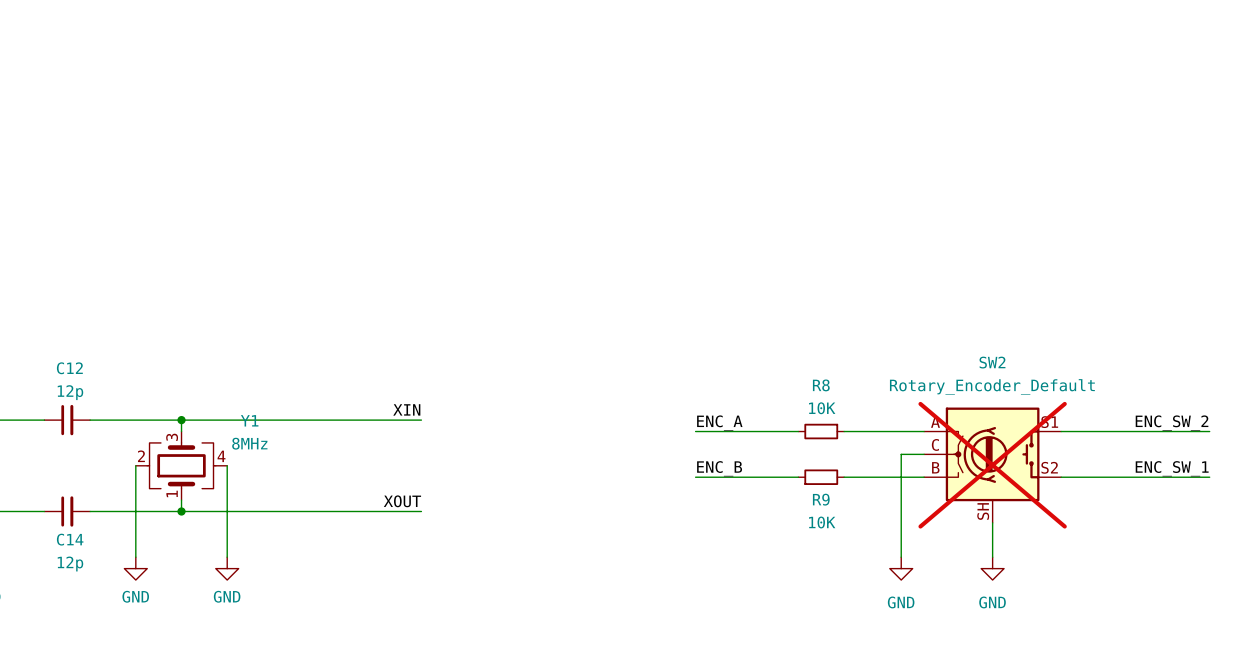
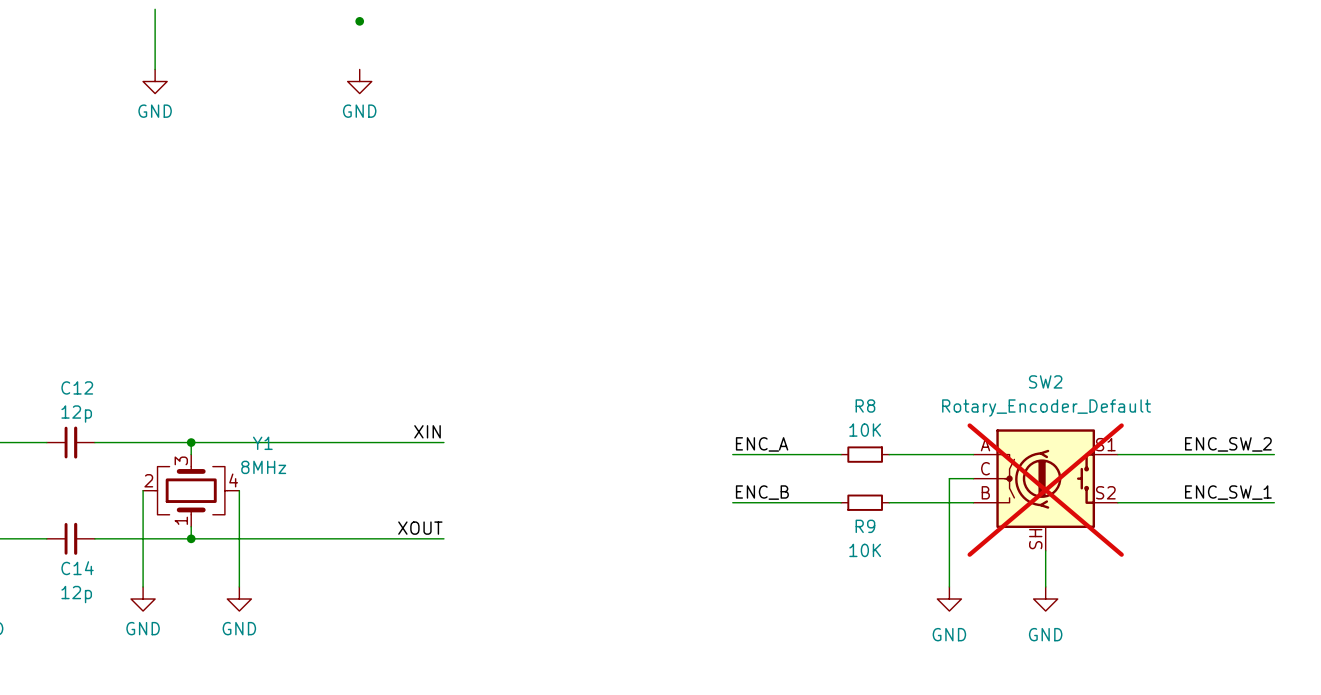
wire: none -> (155, 9) (155, 69)
junction: none -> (359, 21)
power symbol: none -> GND (155, 81)
power symbol: none -> GND (359, 81)

